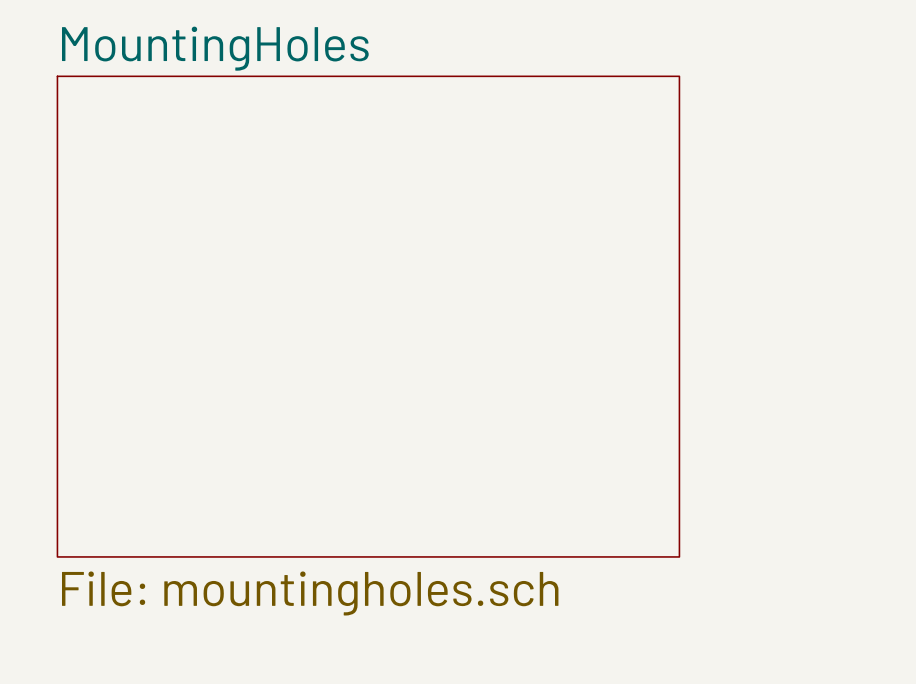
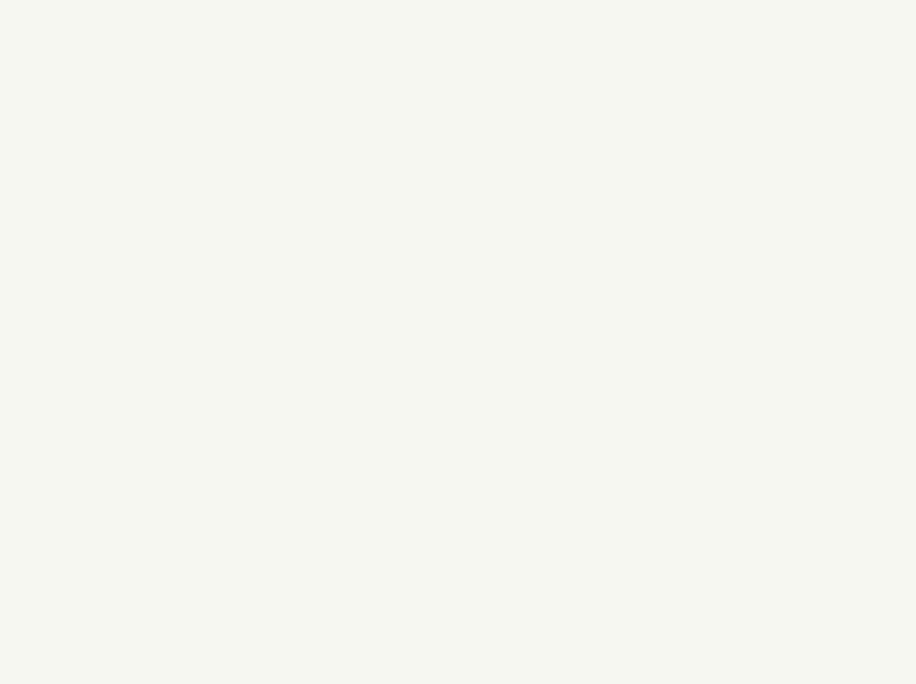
sheet MountingHoles: File: mountingholes.sch (368, 316) -> none

